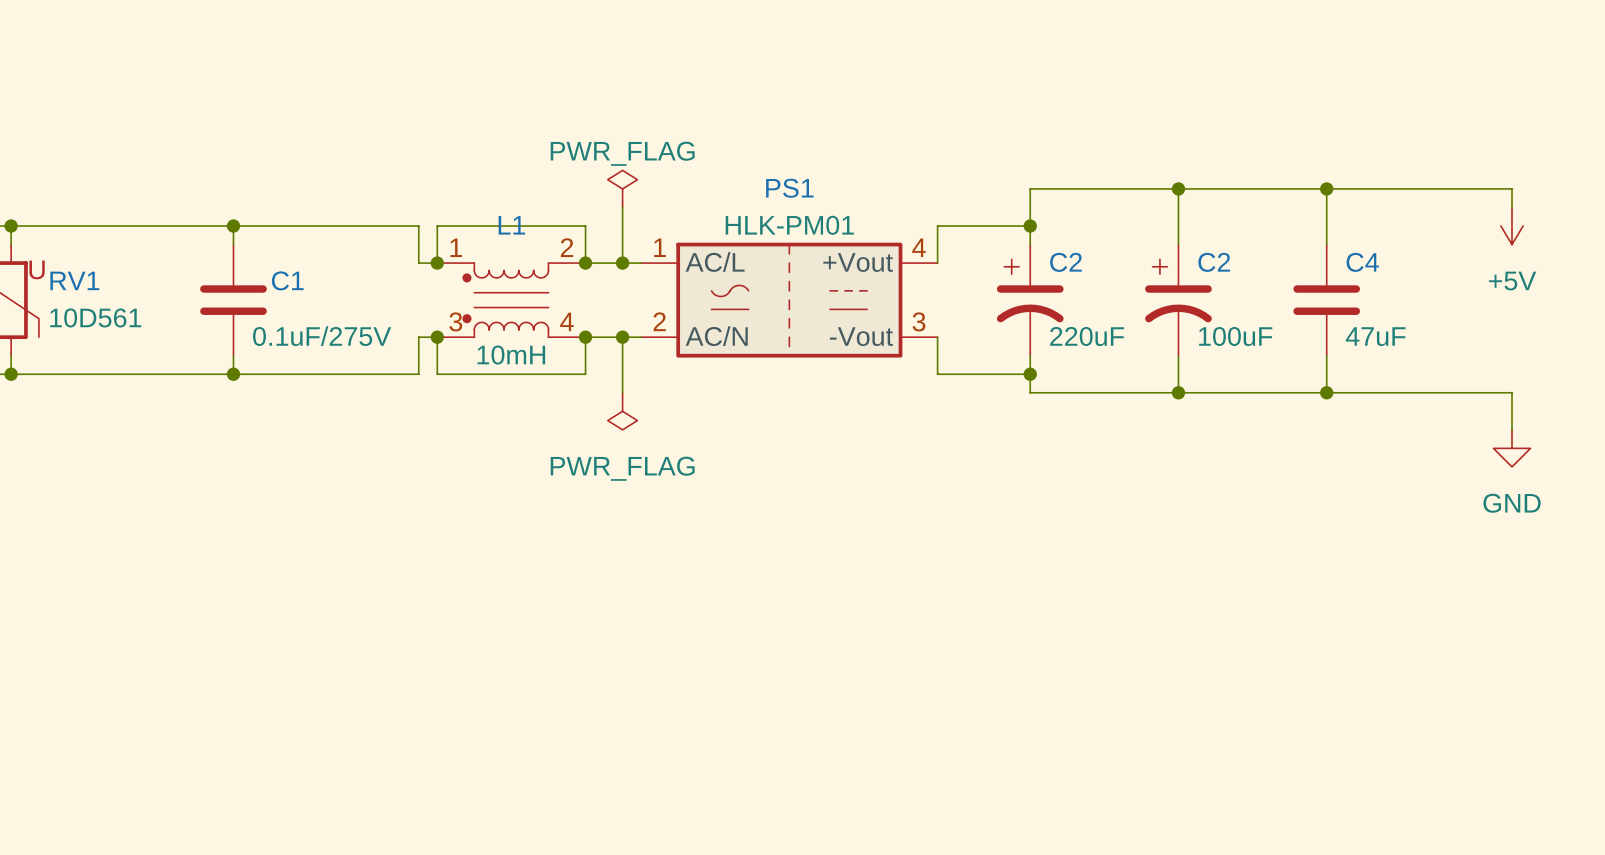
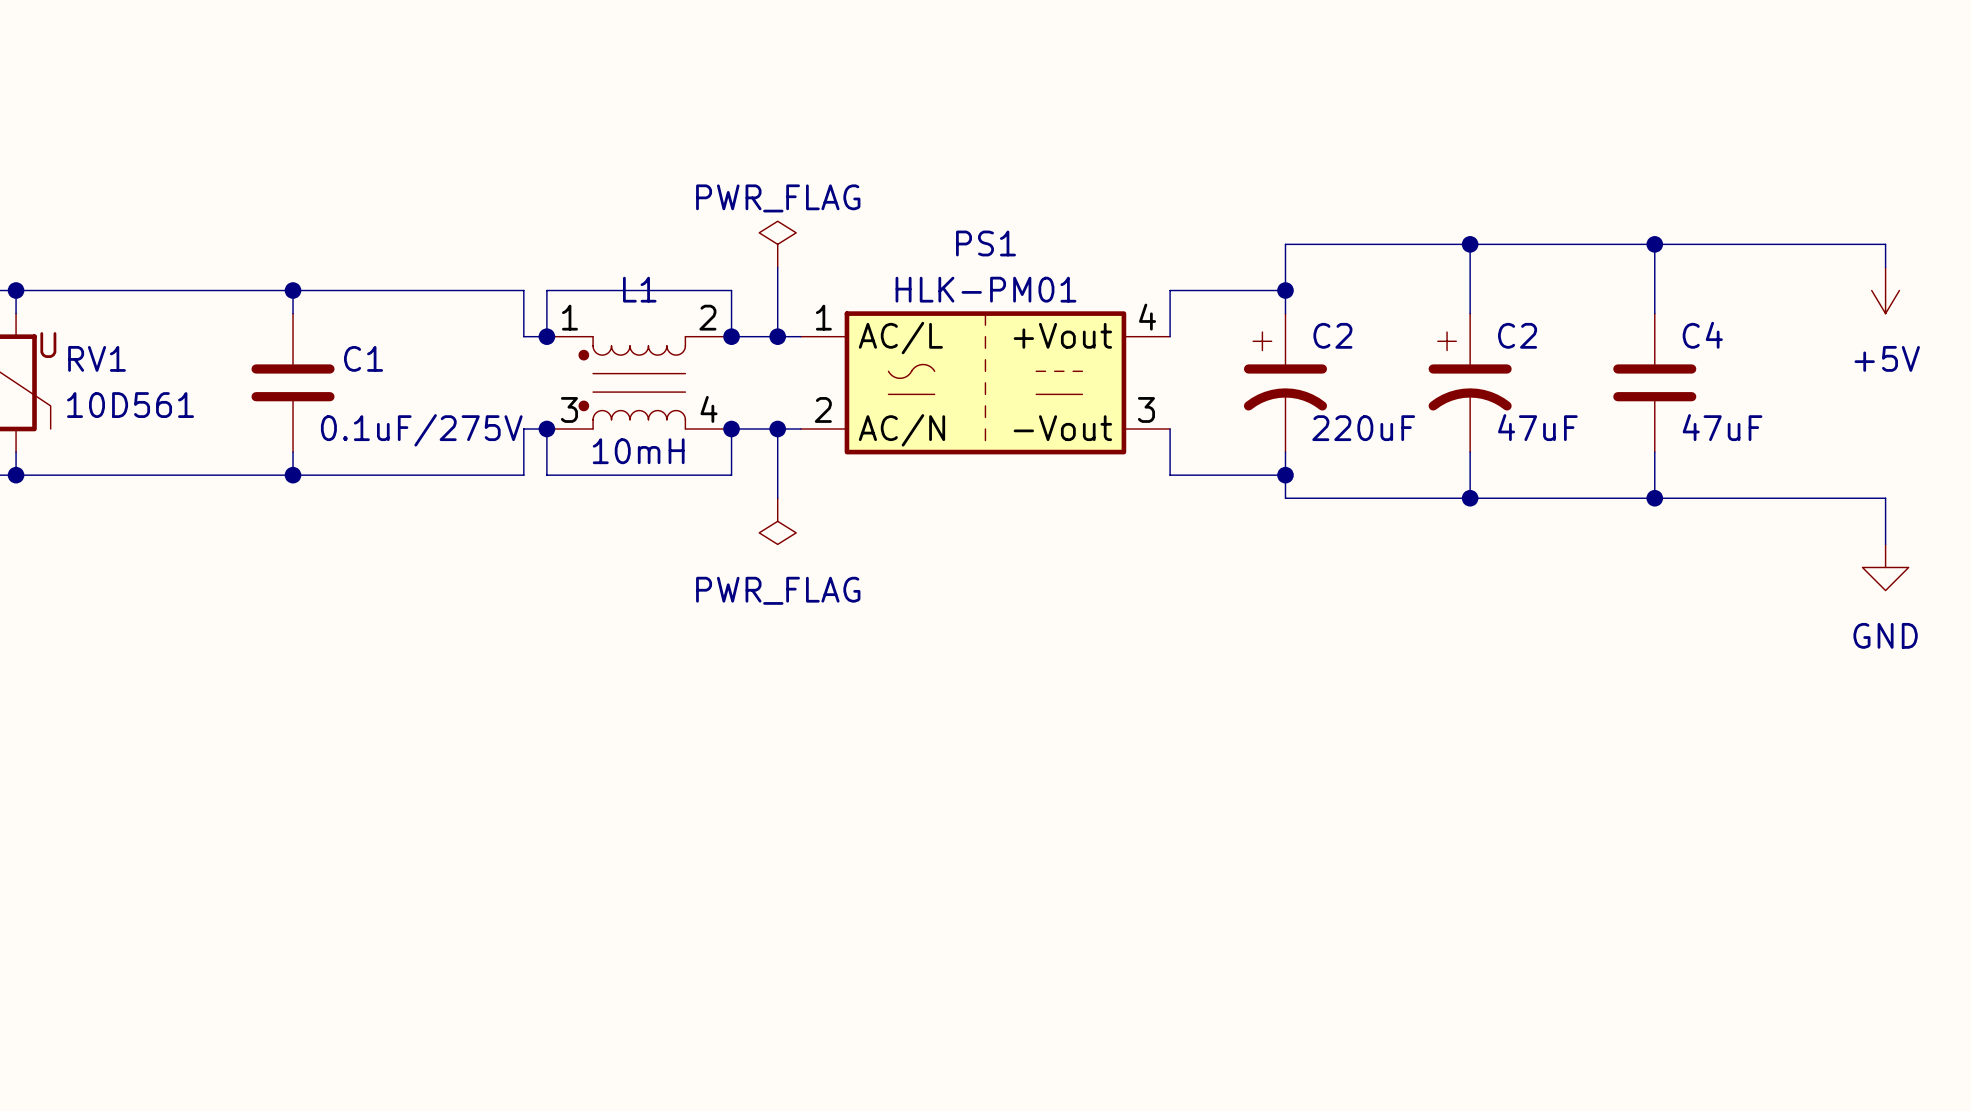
C2 value: 100uF (1235, 336) -> 47uF (1537, 427)

